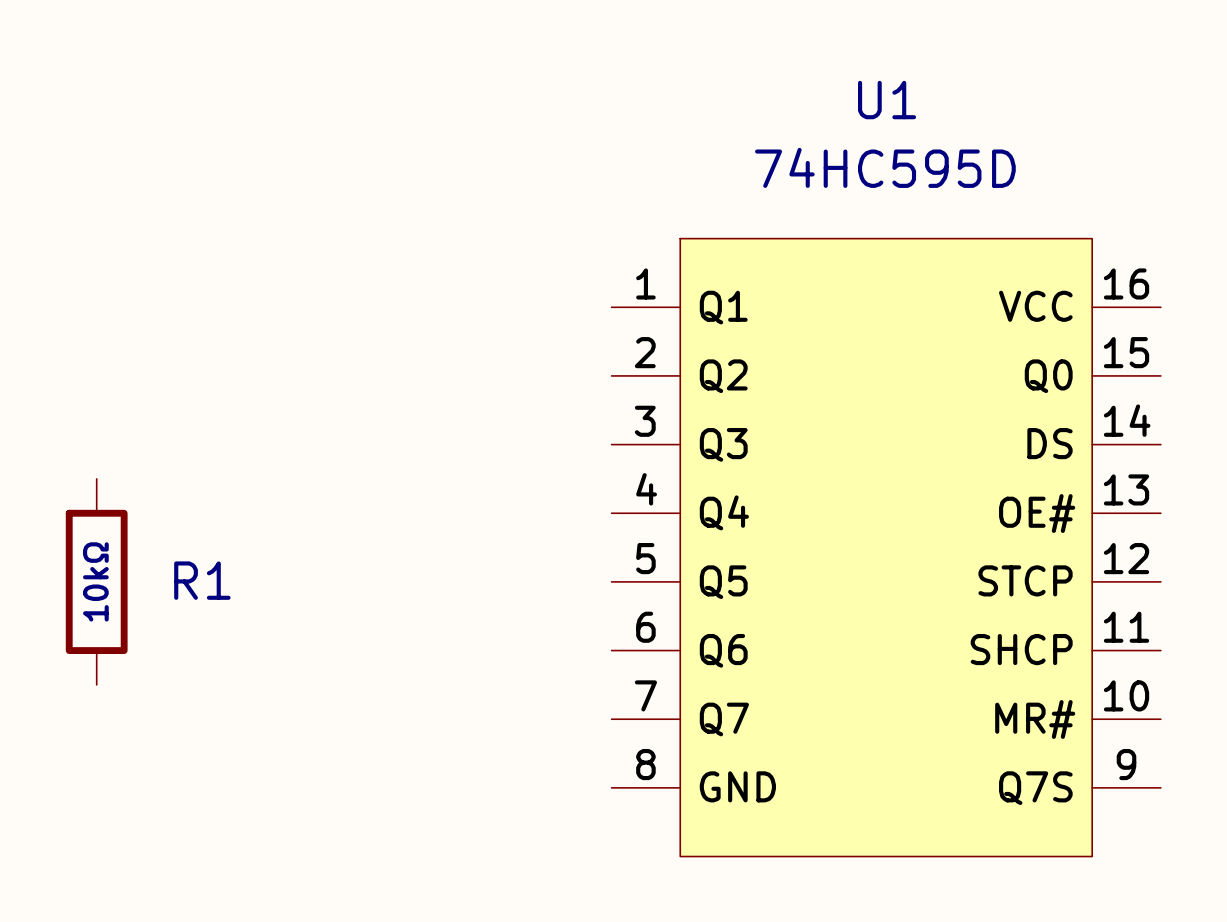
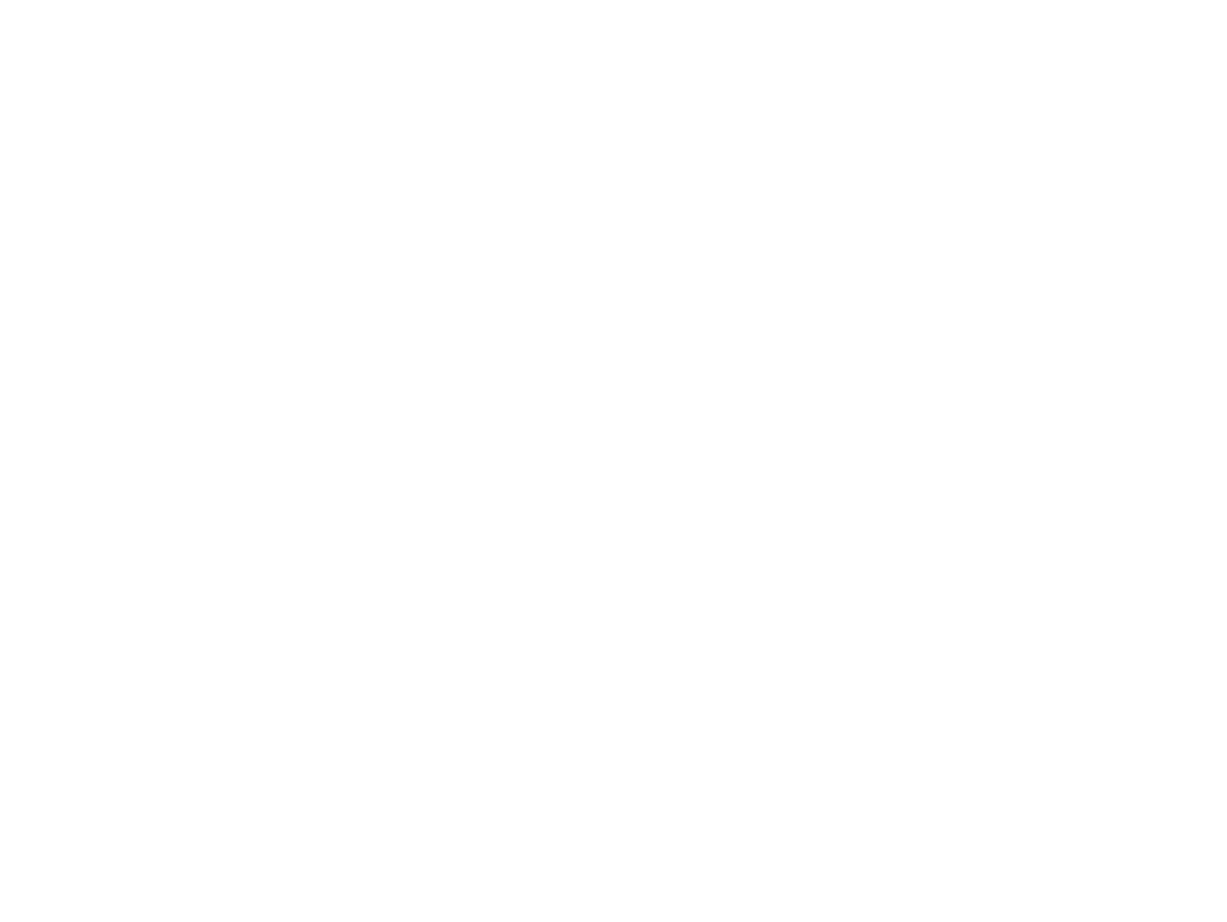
U1: 74HC595D (886, 547) -> none
R1: 10kΩ (96, 581) -> none

